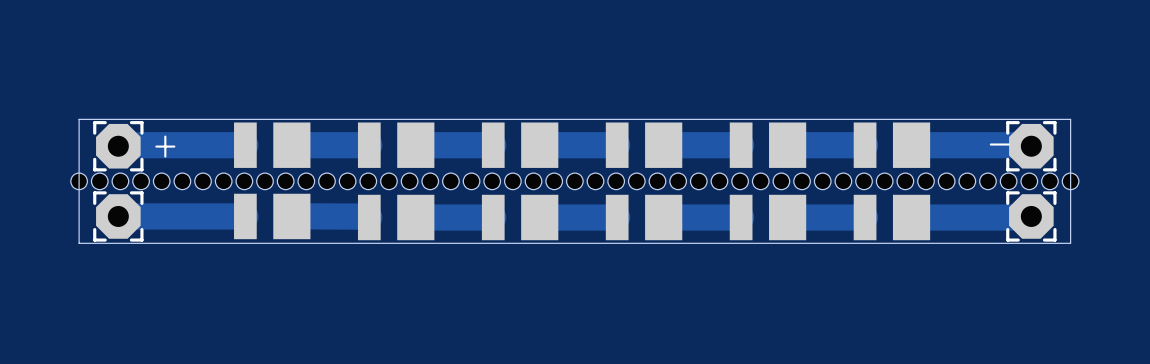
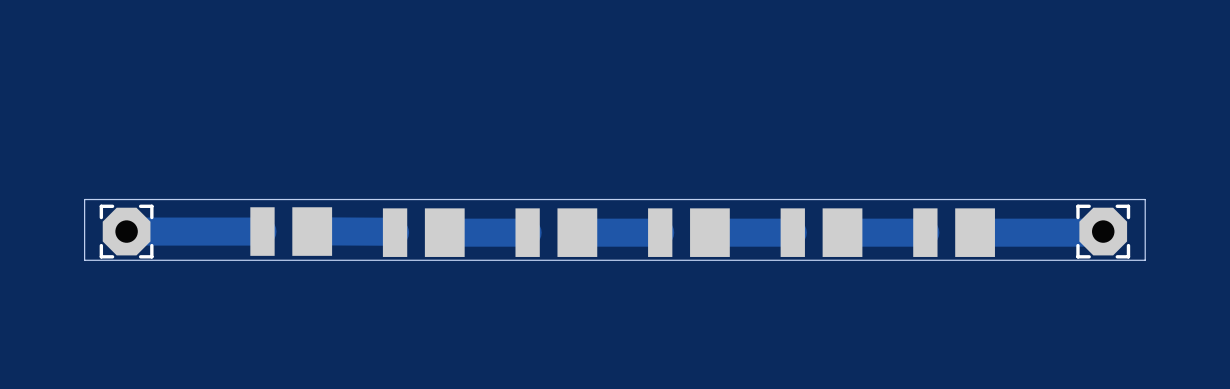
text: - (999, 144) -> none
track: (245, 145) (118, 146) -> none
part: (272, 145) -> none
track: (291, 145) (369, 145) -> none
part: (396, 145) -> none
track: (415, 145) (493, 145) -> none
part: (520, 145) -> none
track: (539, 145) (617, 145) -> none
part: (644, 145) -> none
track: (663, 145) (741, 145) -> none
part: (767, 145) -> none
track: (787, 145) (865, 145) -> none
part: (891, 145) -> none
track: (911, 145) (1031, 146) -> none
part: (118, 146) -> none
text: + (165, 146) -> none
part: (1031, 146) -> none
hole: (79, 181) -> none
hole: (99, 181) -> none
hole: (120, 181) -> none
hole: (141, 181) -> none
hole: (161, 181) -> none
hole: (182, 181) -> none
hole: (203, 181) -> none
hole: (223, 181) -> none
hole: (244, 181) -> none
hole: (265, 181) -> none
hole: (285, 181) -> none
hole: (306, 181) -> none
hole: (326, 181) -> none
hole: (347, 181) -> none
hole: (368, 181) -> none
hole: (388, 181) -> none
hole: (409, 181) -> none
hole: (430, 181) -> none
hole: (450, 181) -> none
hole: (471, 181) -> none
hole: (492, 181) -> none
hole: (512, 181) -> none
hole: (533, 181) -> none
hole: (554, 181) -> none
hole: (574, 181) -> none
hole: (595, 181) -> none
hole: (616, 181) -> none
hole: (636, 181) -> none
hole: (657, 181) -> none
hole: (678, 181) -> none
hole: (698, 181) -> none
hole: (719, 181) -> none
hole: (740, 181) -> none
hole: (760, 181) -> none
hole: (781, 181) -> none
hole: (802, 181) -> none
hole: (822, 181) -> none
hole: (843, 181) -> none
hole: (864, 181) -> none
hole: (884, 181) -> none
hole: (905, 181) -> none
hole: (926, 181) -> none
hole: (946, 181) -> none
hole: (967, 181) -> none
hole: (987, 181) -> none
hole: (1008, 181) -> none
hole: (1029, 181) -> none
hole: (1049, 181) -> none
hole: (1070, 181) -> none
board edge: (79, 186) (79, 119) (1070, 119) (1070, 186) -> (84, 199) (1145, 199)

